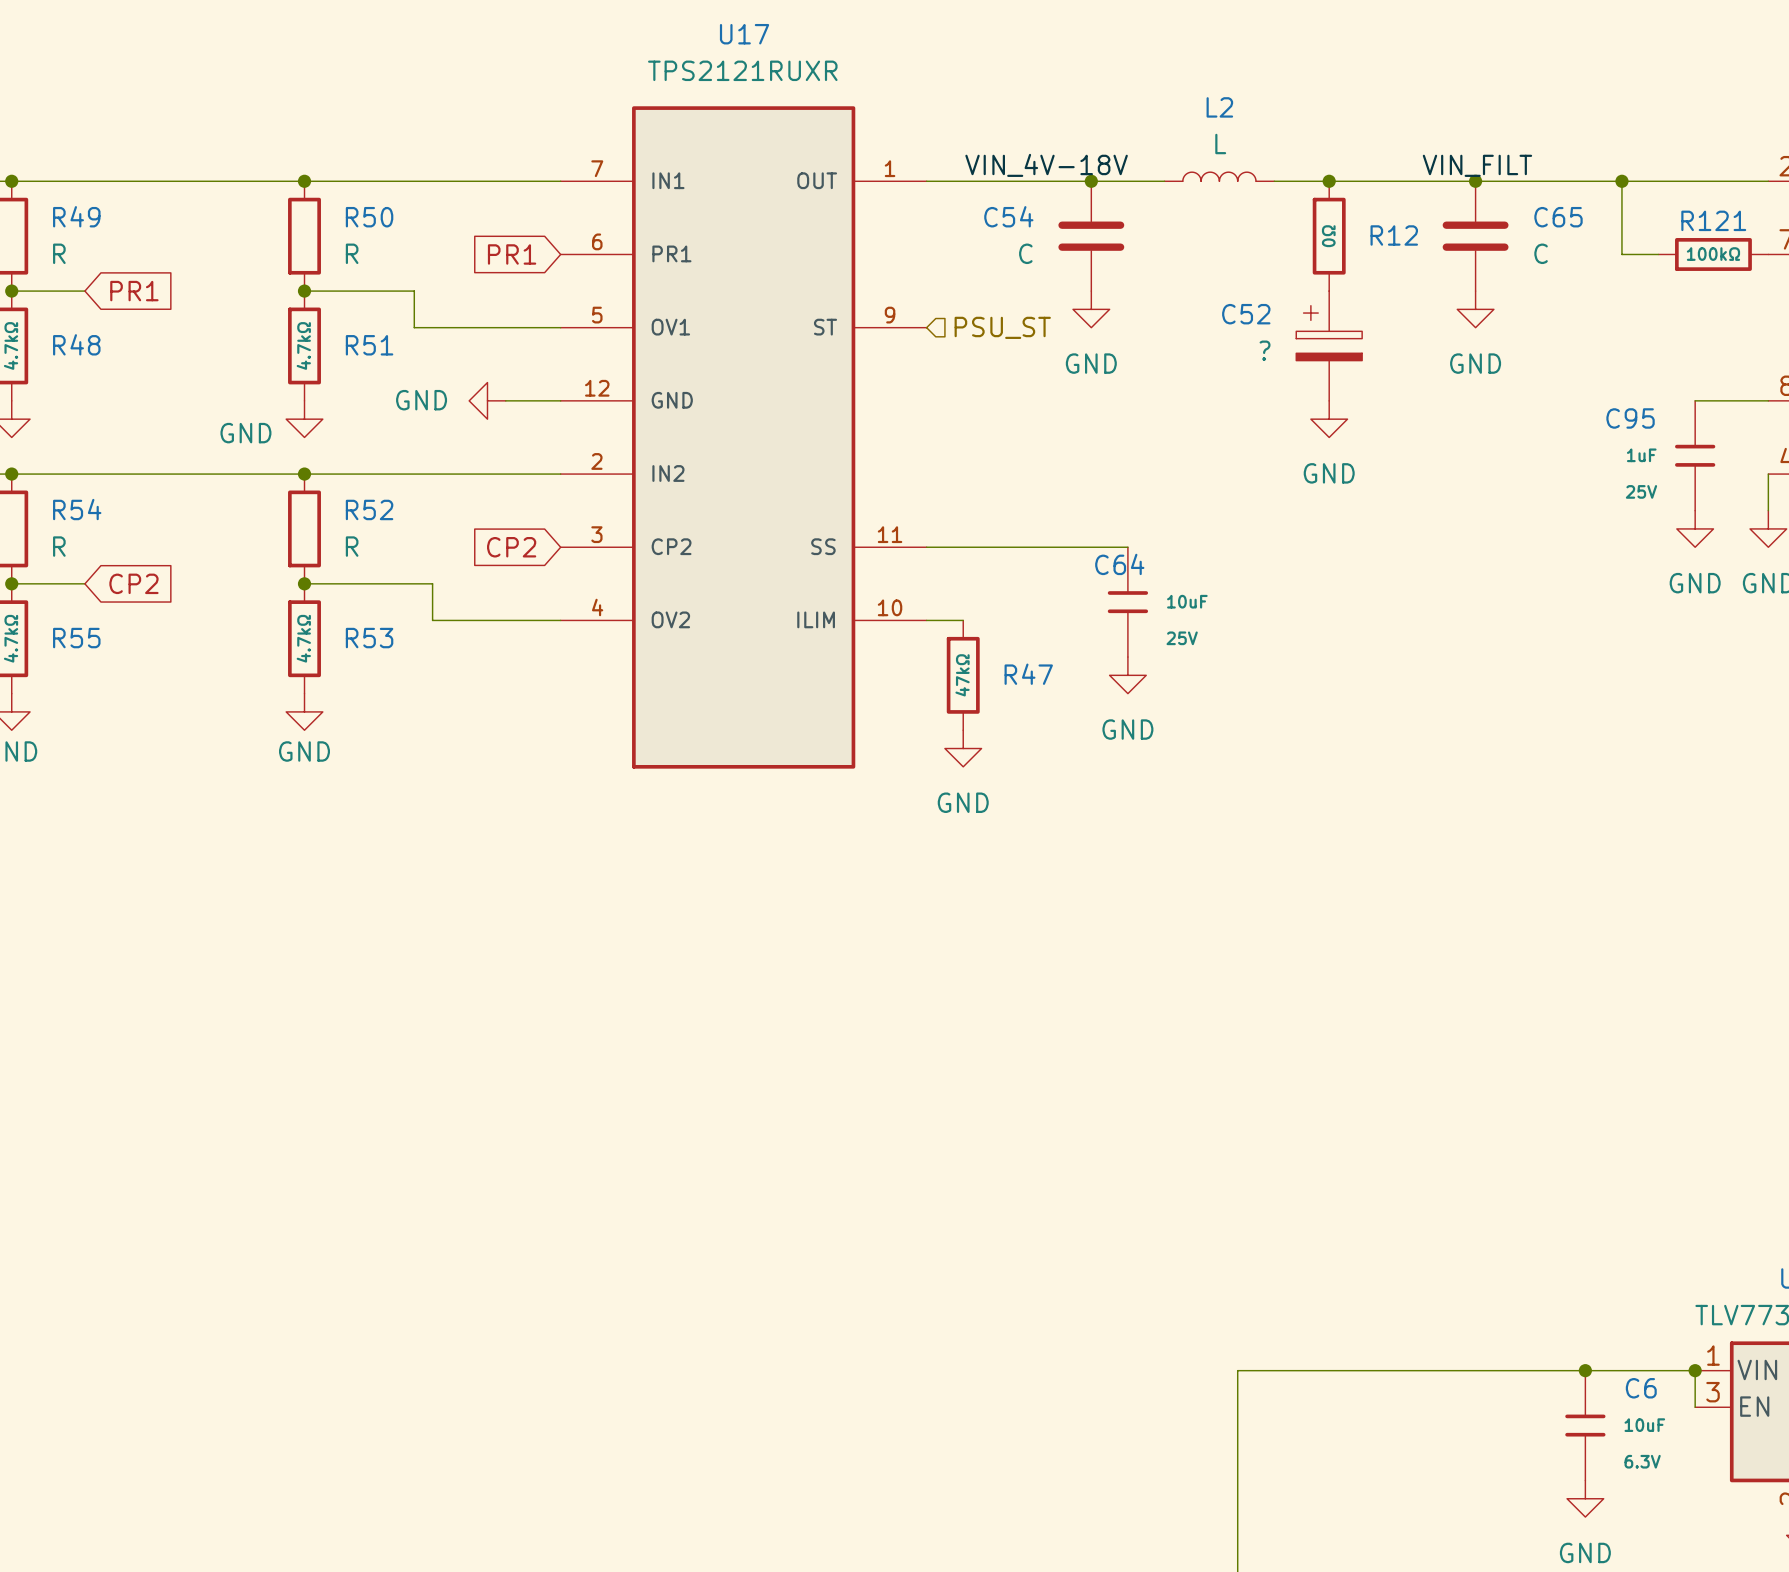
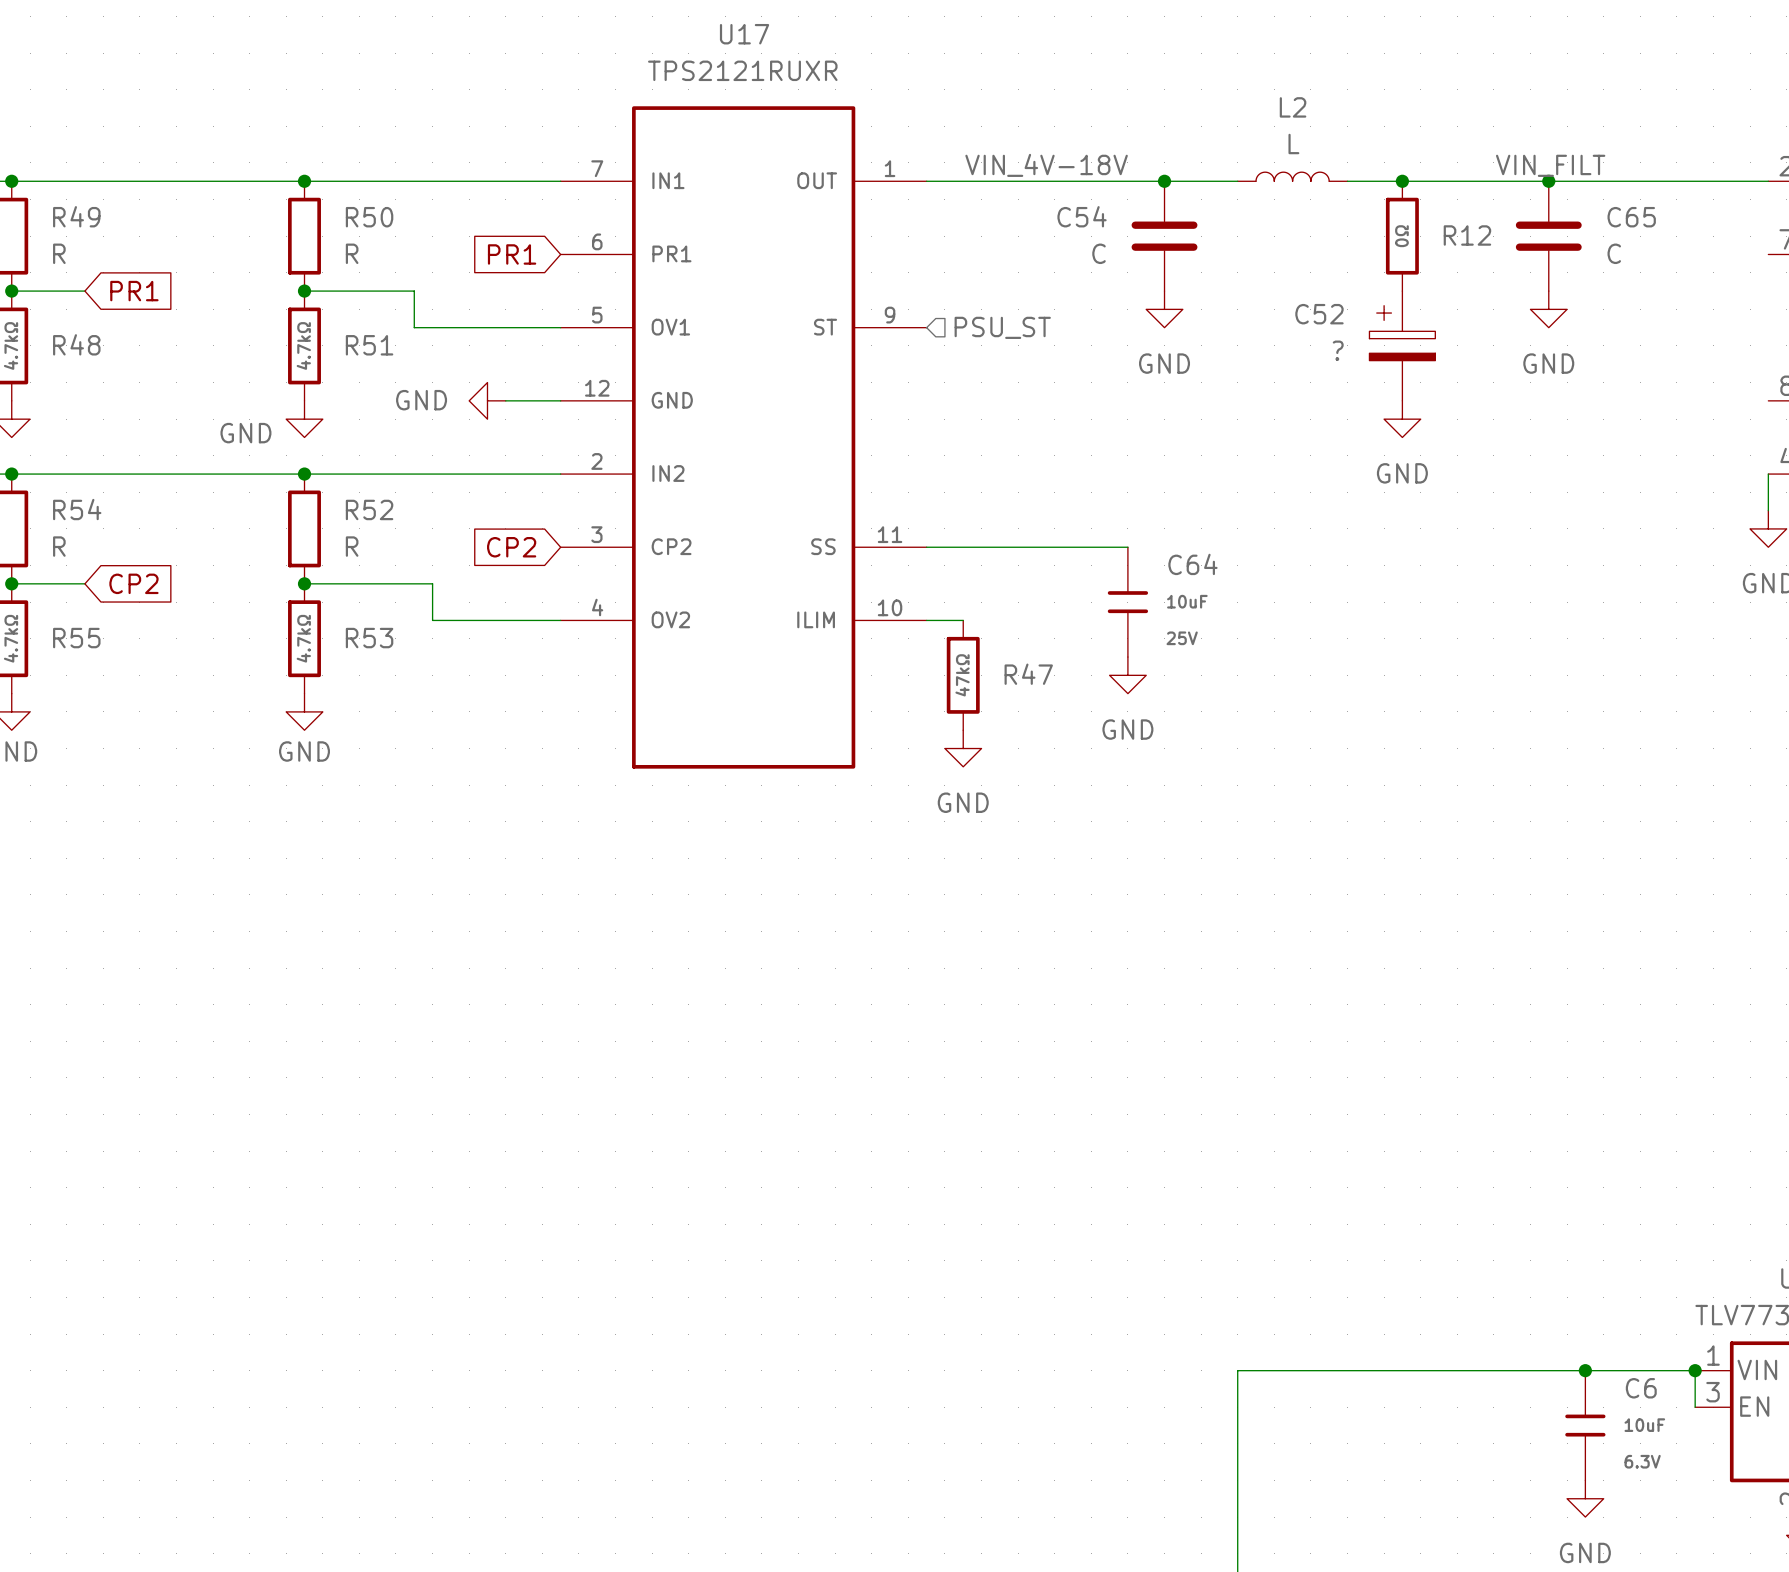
label position: VIN_FILT (1477, 165) -> VIN_FILT (1550, 165)
L2 position: (1219, 176) -> (1292, 176)
junction position: (1091, 181) -> (1164, 181)
wire: (1274, 181) (1347, 181) -> (1164, 181) (1237, 181)
junction: (1329, 181) -> none
junction: none -> (1402, 181)
junction: (1475, 181) -> none
junction: none -> (1548, 181)
wire: (1621, 181) (1621, 254) (1658, 254) -> none
junction: (1621, 181) -> none
C54 position: (1091, 236) -> (1164, 236)
R12 position: (1329, 236) -> (1402, 236)
C65 position: (1475, 236) -> (1548, 236)
R121: 100kΩ (1713, 254) -> none
power symbol position: GND (1091, 309) -> GND (1164, 309)
power symbol: GND (1475, 309) -> none
power symbol: none -> GND (1548, 309)
C52 position: (1329, 345) -> (1402, 345)
wire: (1695, 400) (1768, 400) -> none
power symbol: GND (1329, 419) -> none
power symbol: none -> GND (1402, 419)
C95: 1uF (1695, 455) -> none
power symbol: GND (1695, 528) -> none
C64 name position: C64 (1119, 564) -> C64 (1192, 564)

